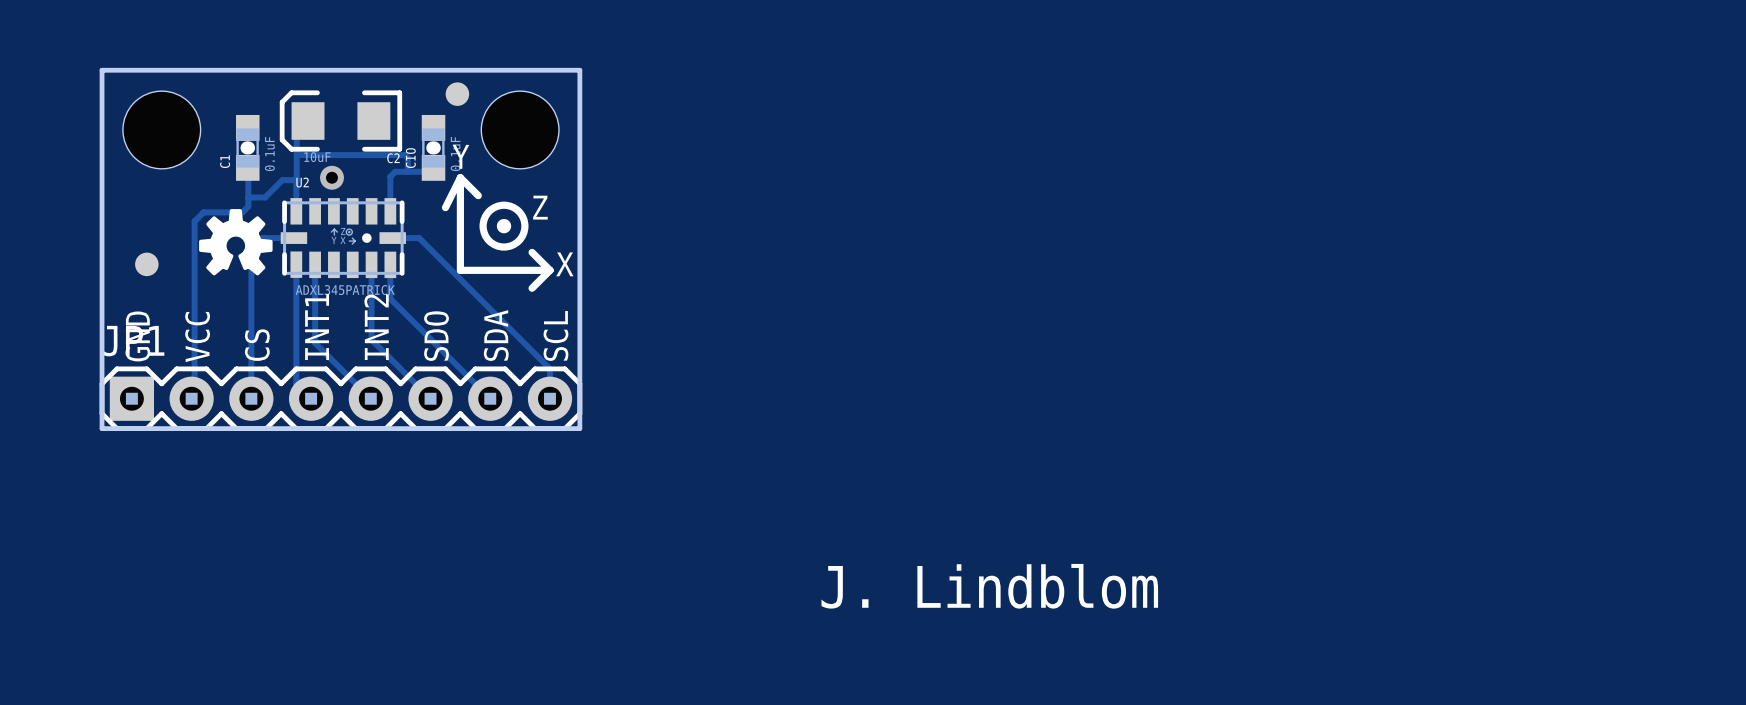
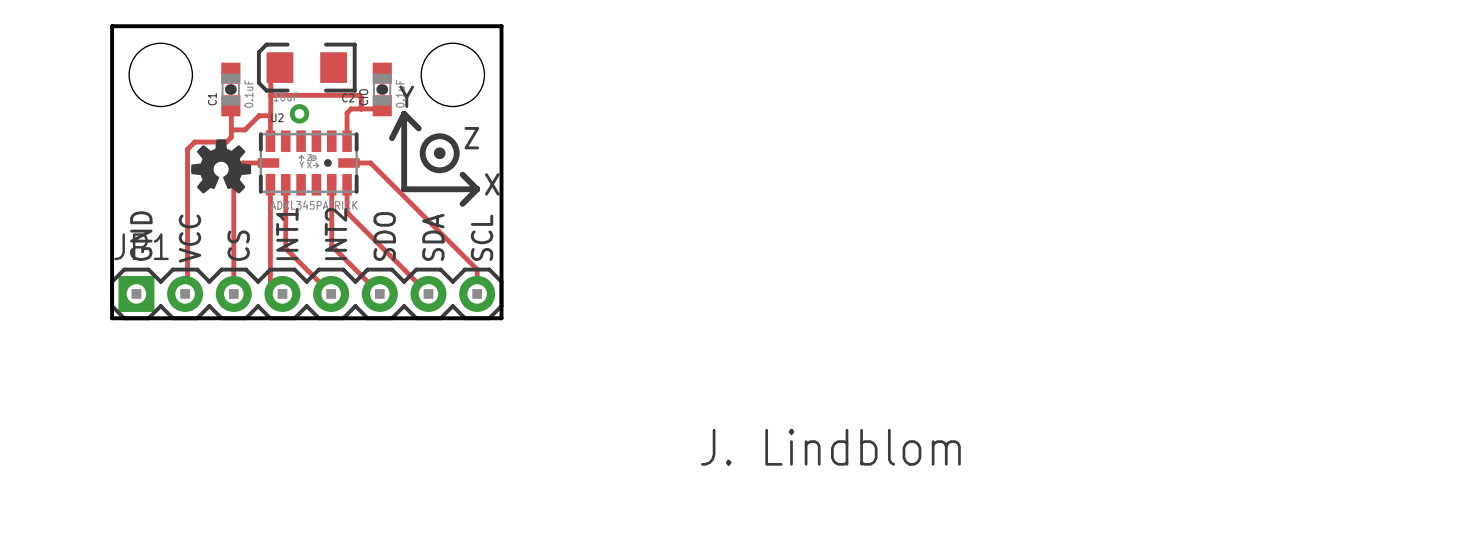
part: (457, 94) -> none
part: (146, 264) -> none

